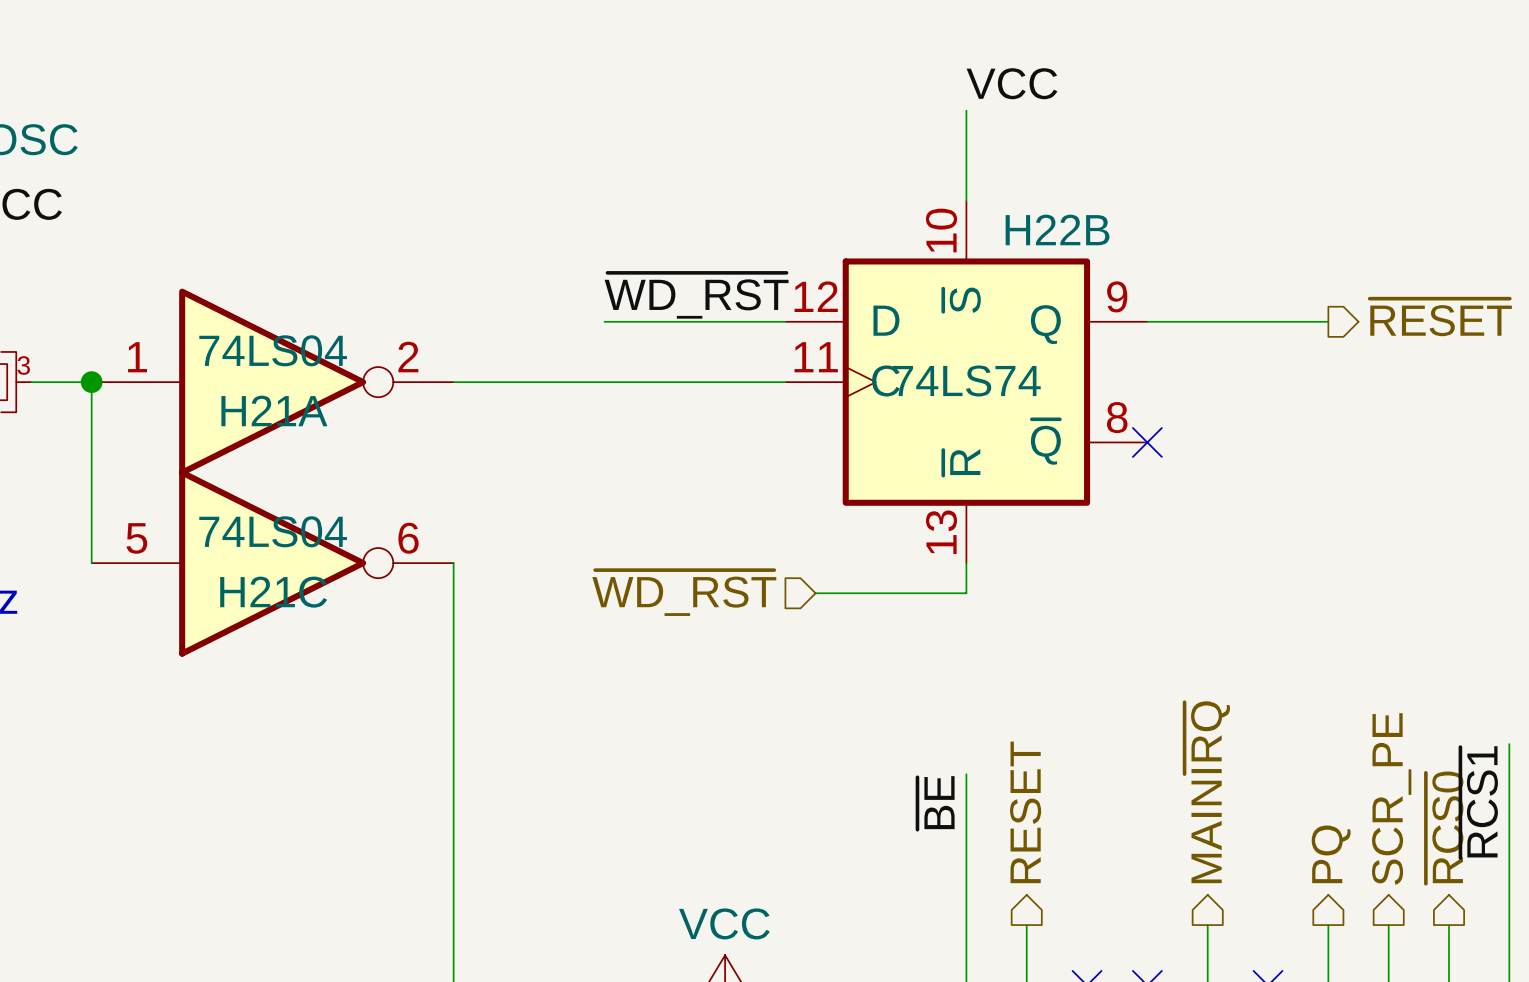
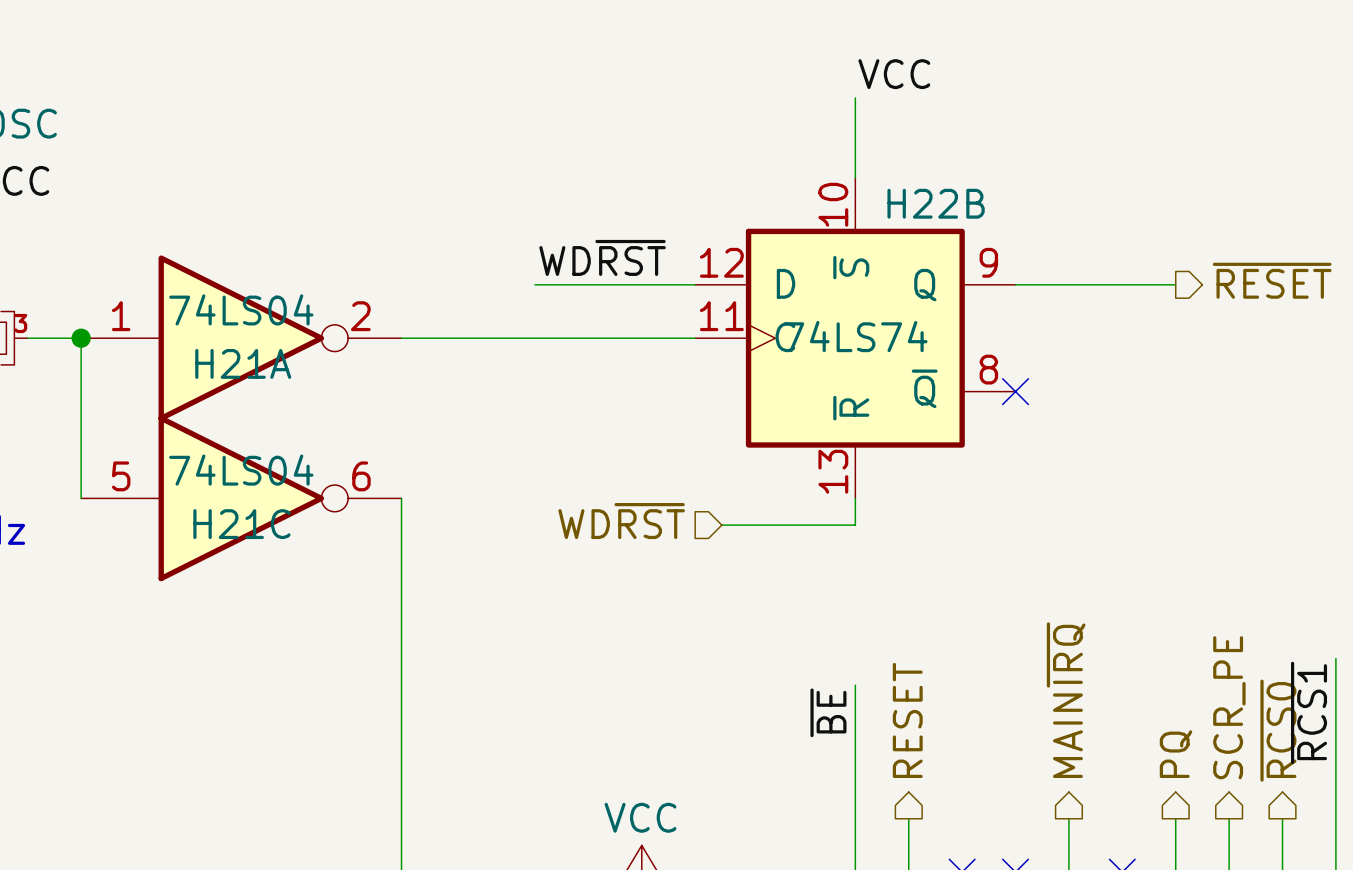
label: ~{WD_RST} (696, 295) -> WD~{RST} (602, 257)
hierarchical label: ~{WD_RST} (684, 593) -> WD~{RST} (621, 521)

